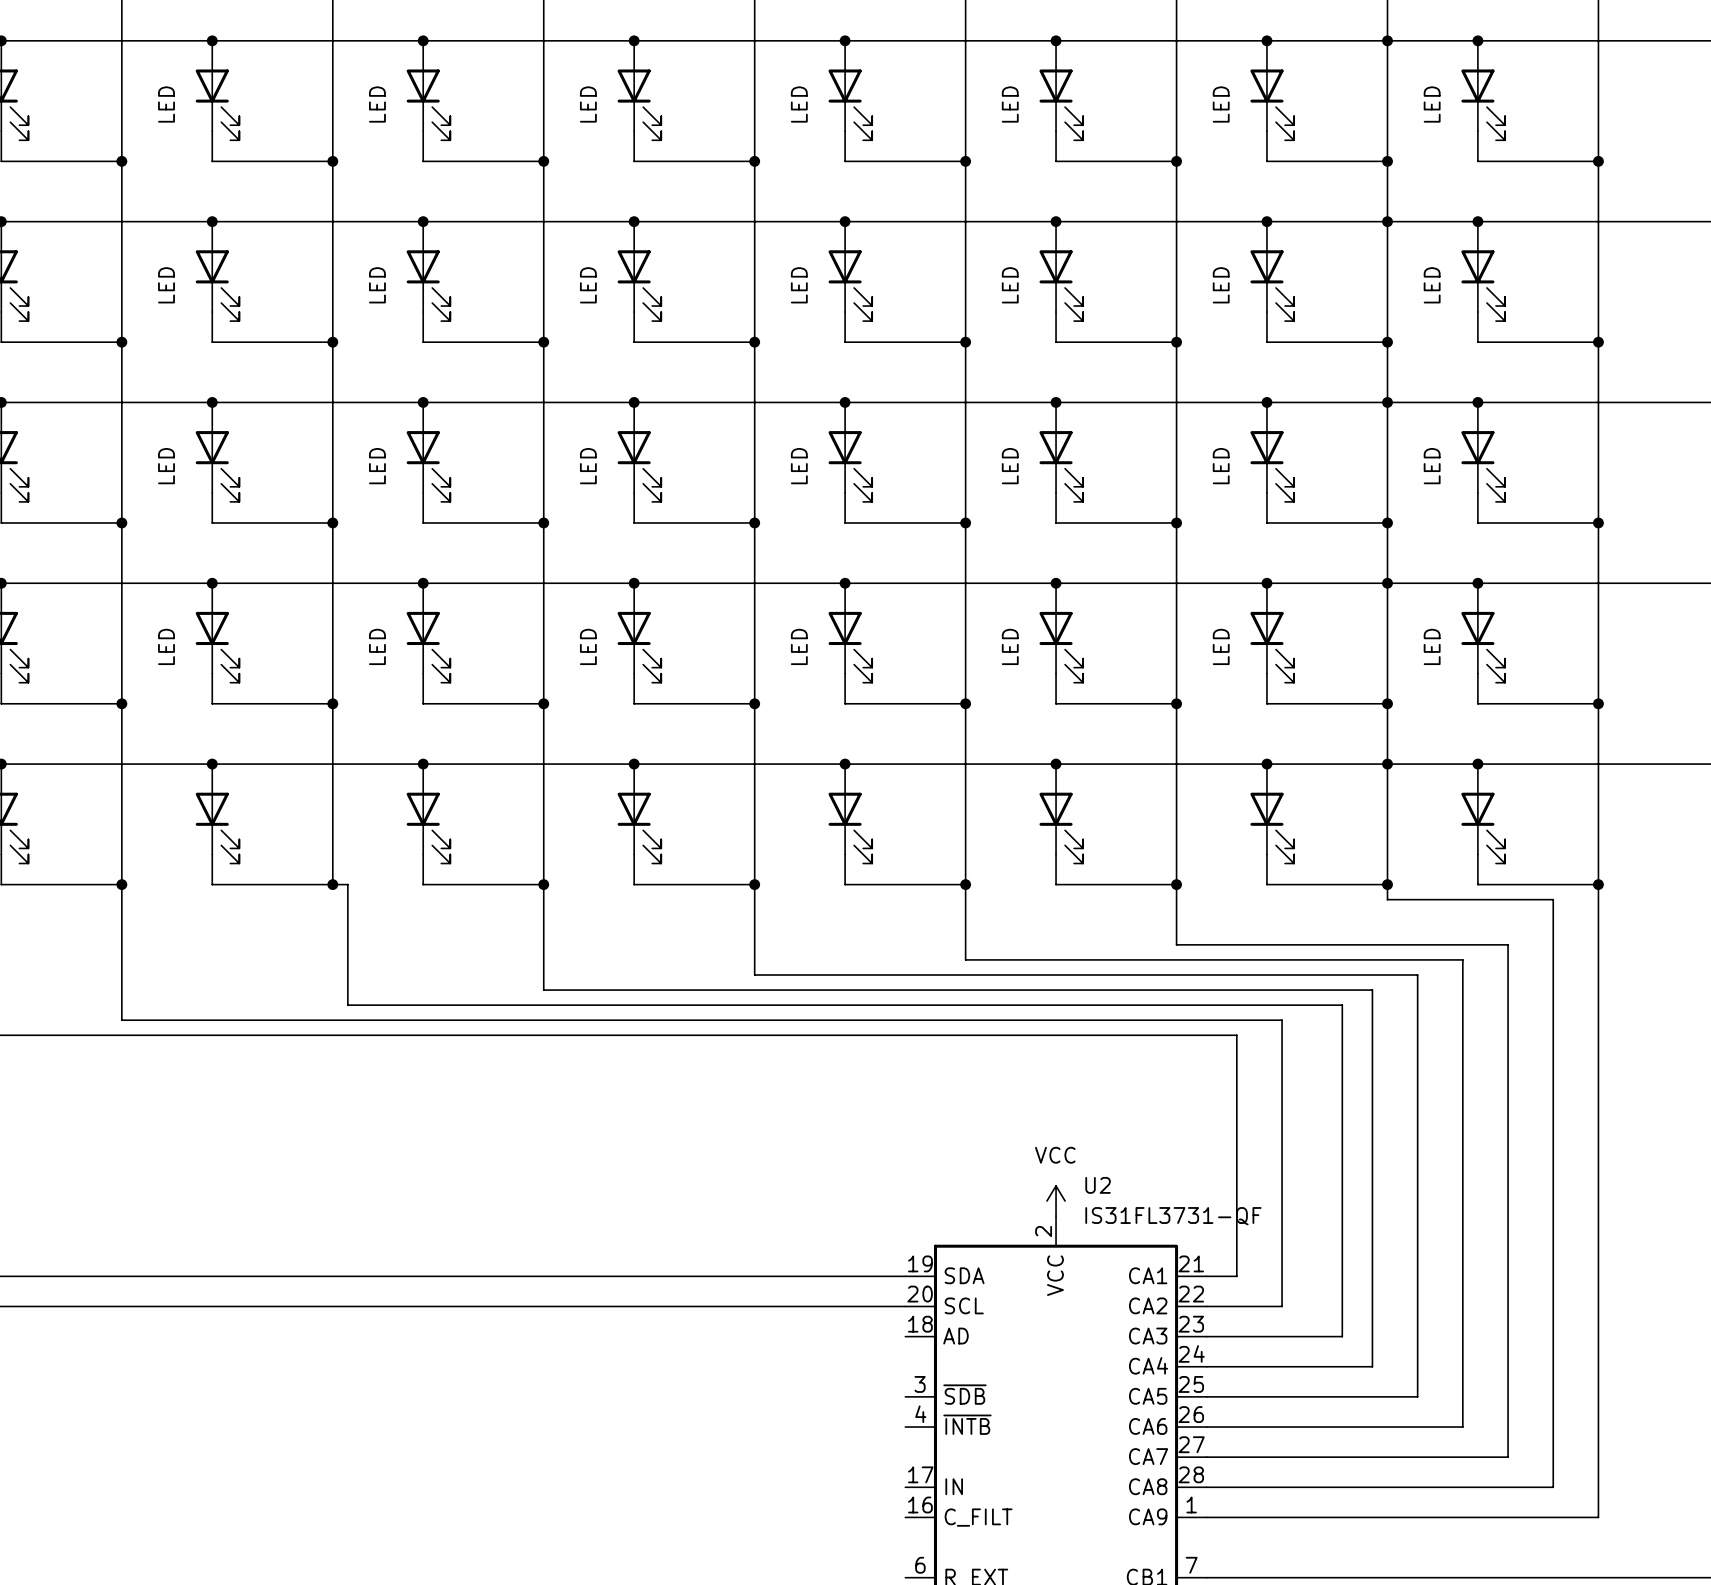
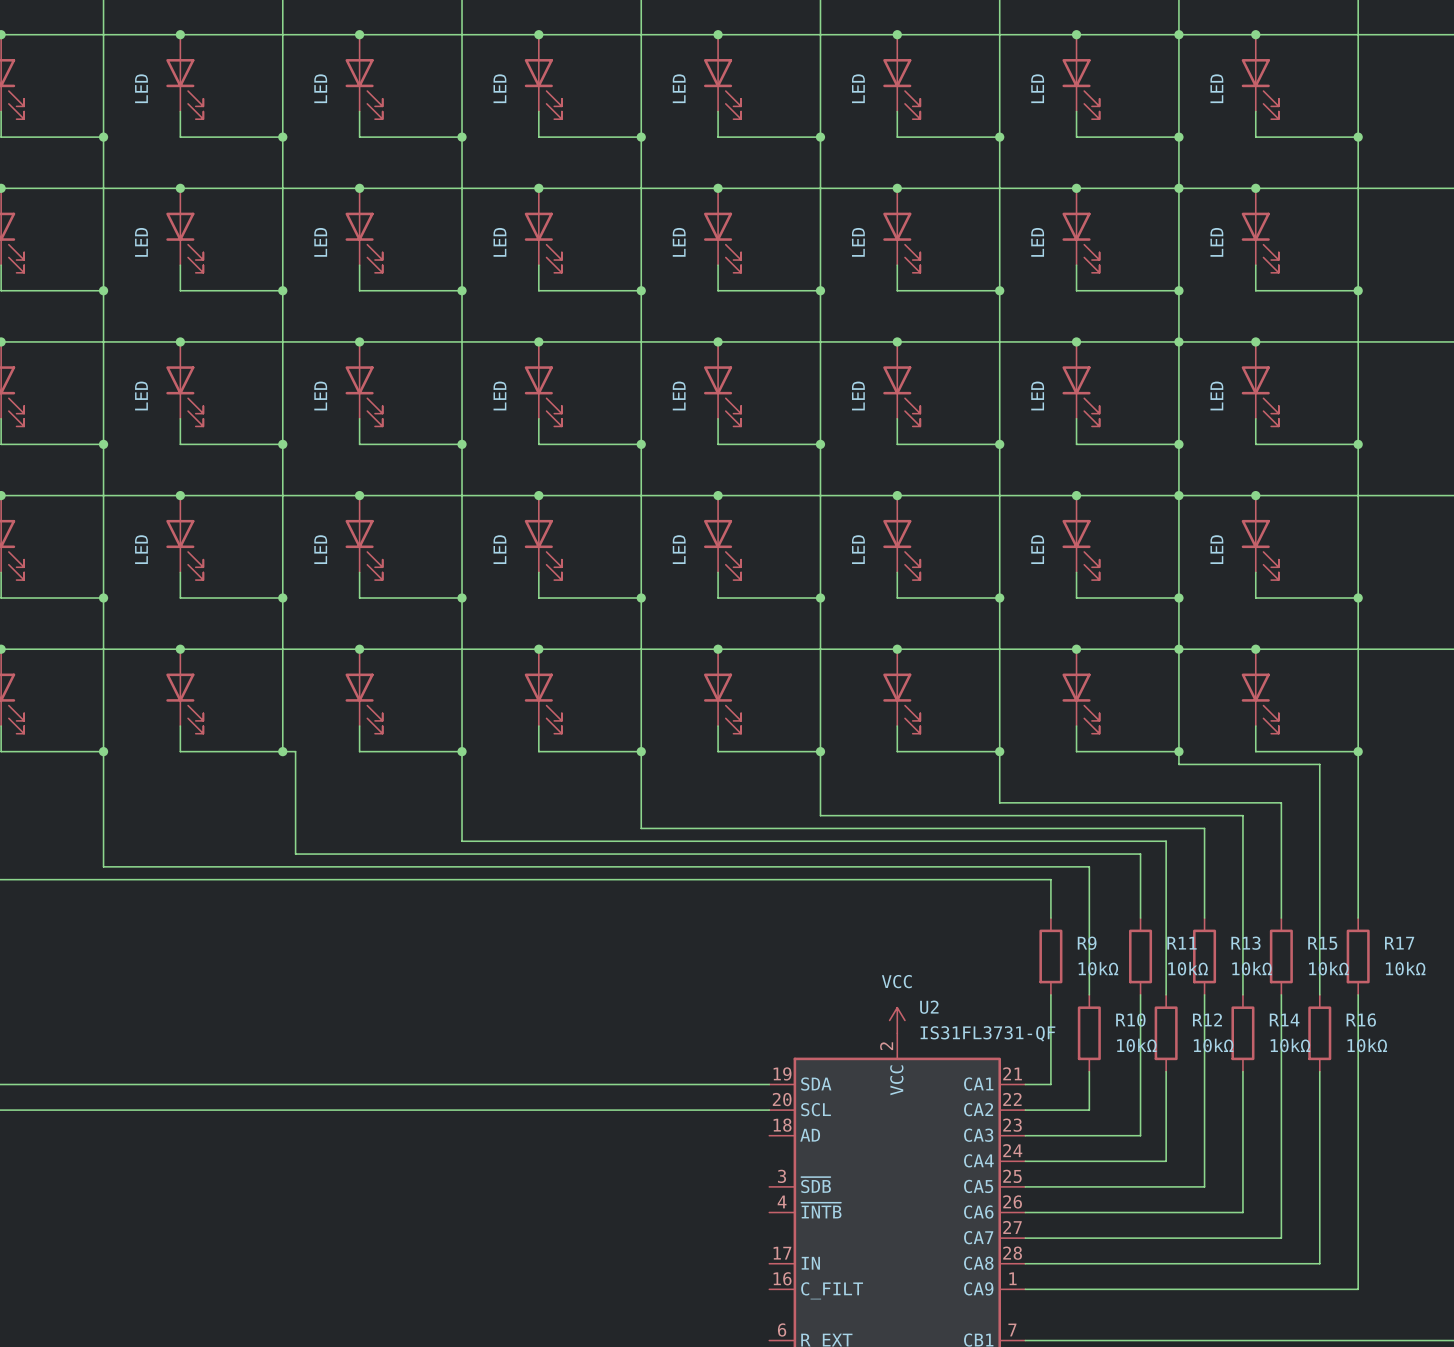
wire: (1236, 1080) (1236, 1170) -> none
wire: (1342, 1080) (1342, 1170) -> none
wire: (1417, 1080) (1417, 1170) -> none
wire: (1508, 1080) (1508, 1170) -> none
wire: (1598, 1080) (1598, 1170) -> none
R9: none -> 10kΩ (1050, 956)
R11: none -> 10kΩ (1140, 956)
R13: none -> 10kΩ (1204, 956)
R15: none -> 10kΩ (1281, 956)
R17: none -> 10kΩ (1358, 956)
wire: (1282, 1170) (1282, 1261) -> none
wire: (1372, 1170) (1372, 1261) -> none
wire: (1462, 1170) (1462, 1261) -> none
wire: (1553, 1170) (1553, 1261) -> none
R10: none -> 10kΩ (1089, 1033)
R12: none -> 10kΩ (1166, 1033)
R14: none -> 10kΩ (1242, 1033)
R16: none -> 10kΩ (1319, 1033)

